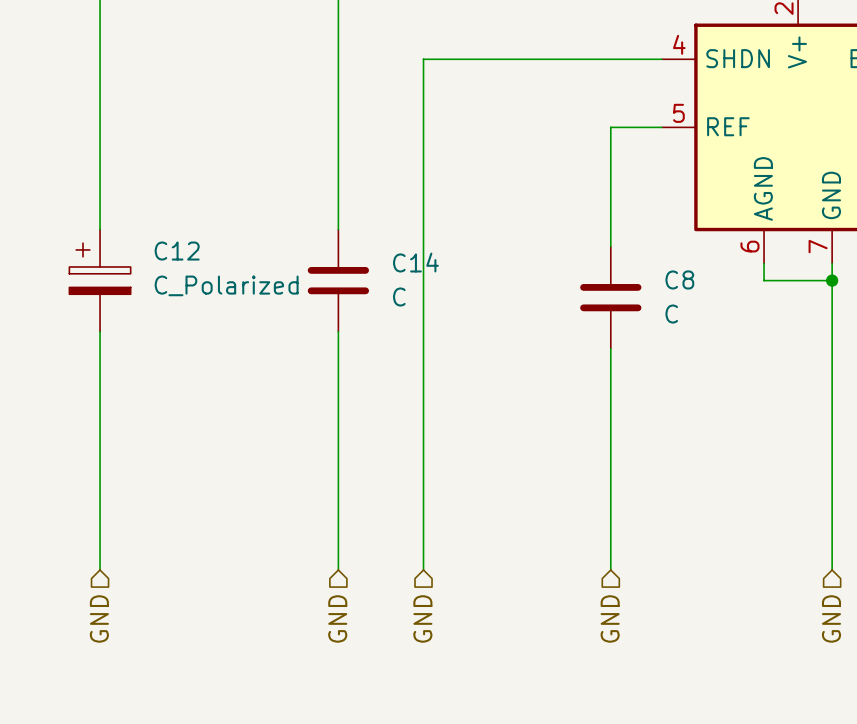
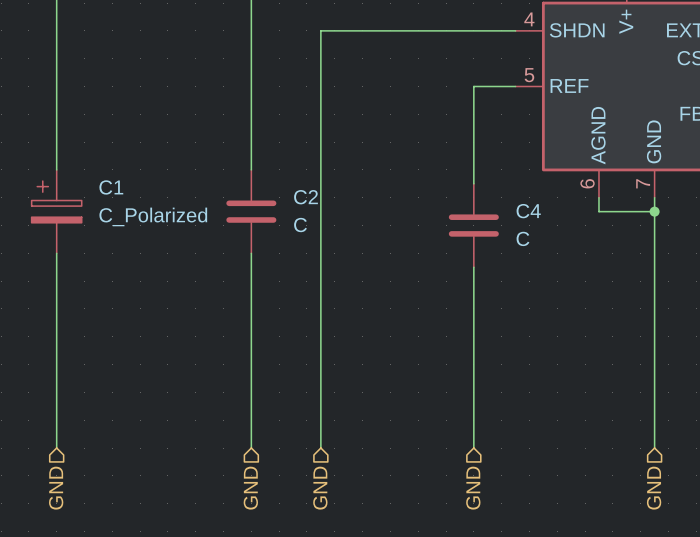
C12 name: C12 (177, 251) -> C1 (111, 187)
C14 name: C14 (415, 262) -> C2 (305, 197)
C8 name: C8 (679, 279) -> C4 (528, 211)

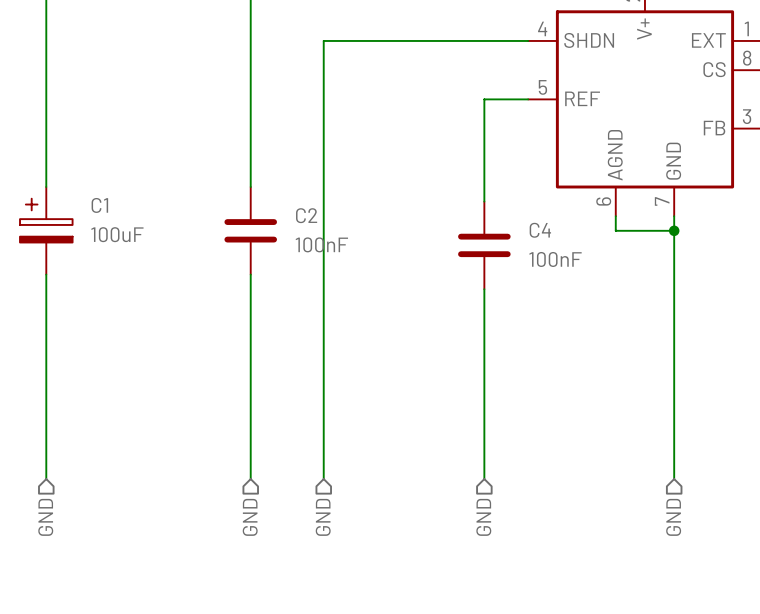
C1 value: C_Polarized (153, 216) -> 100uF (117, 234)
C2 value: C (300, 225) -> 100nF (321, 244)
C4 value: C (522, 238) -> 100nF (555, 259)

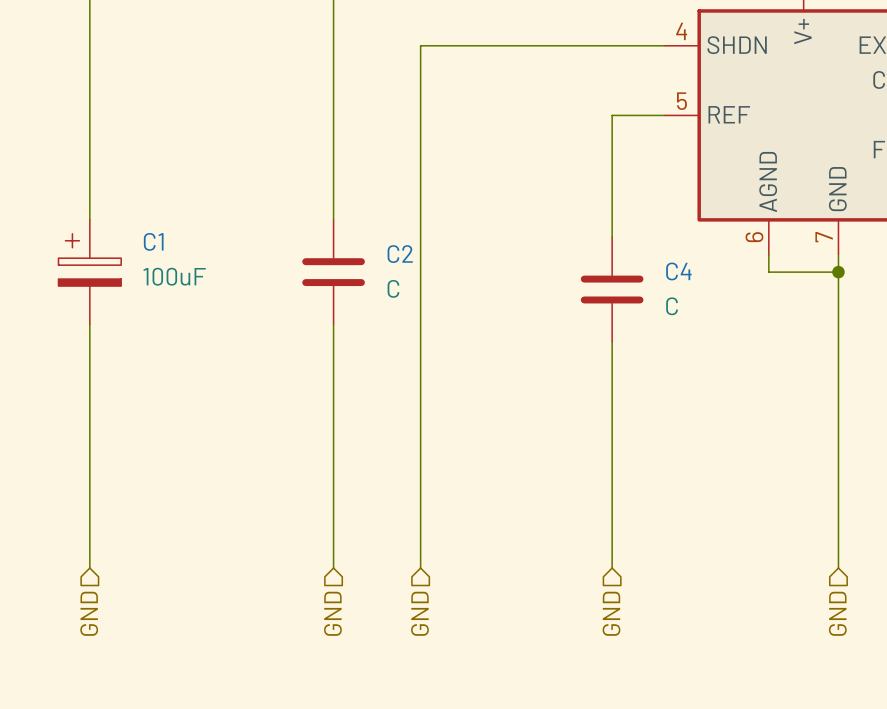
C2 value: 100nF (321, 244) -> C (393, 288)
C4 value: 100nF (555, 259) -> C (672, 306)

